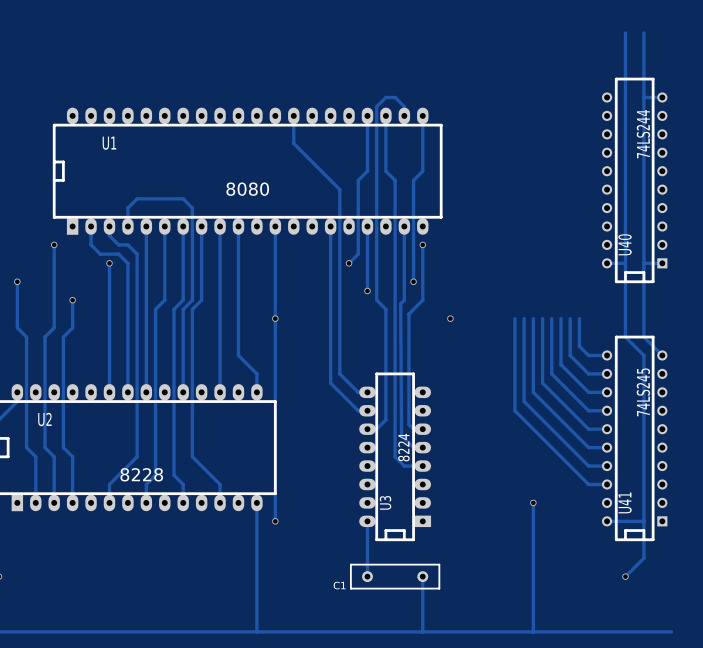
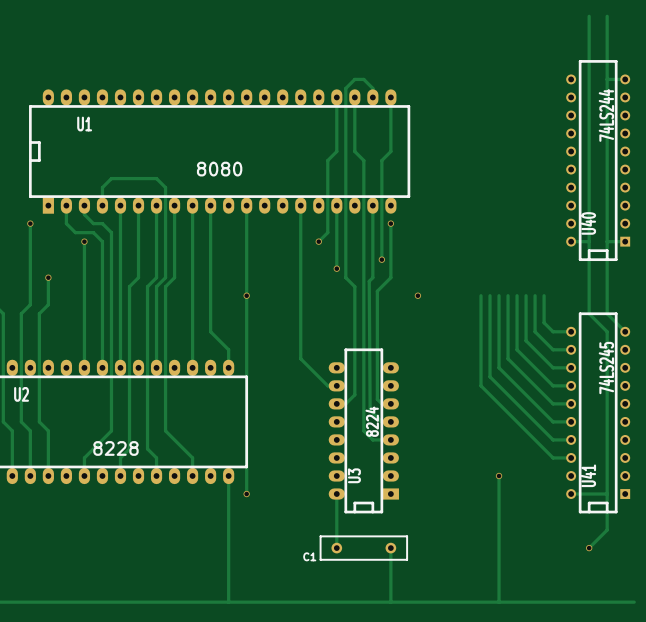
track: (293, 115) (293, 143) (339, 189) (339, 373) (358, 392) (367, 392) -> none

